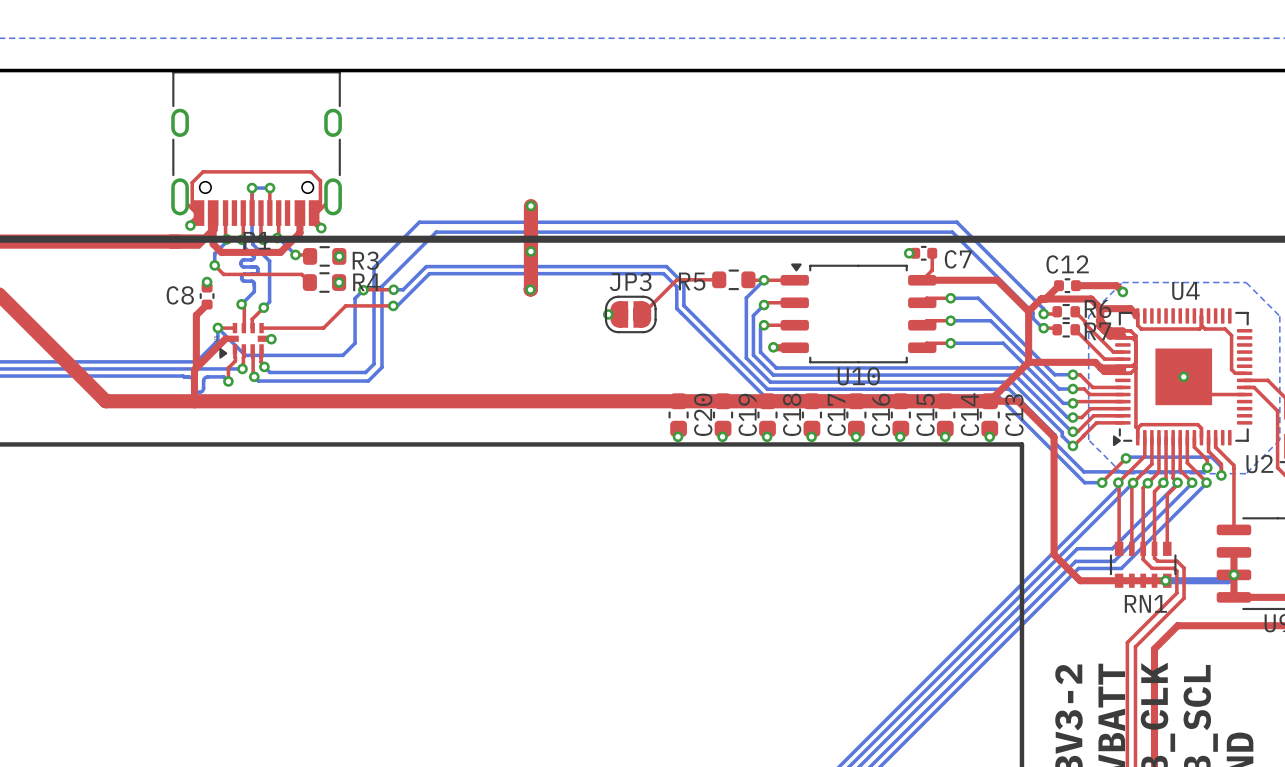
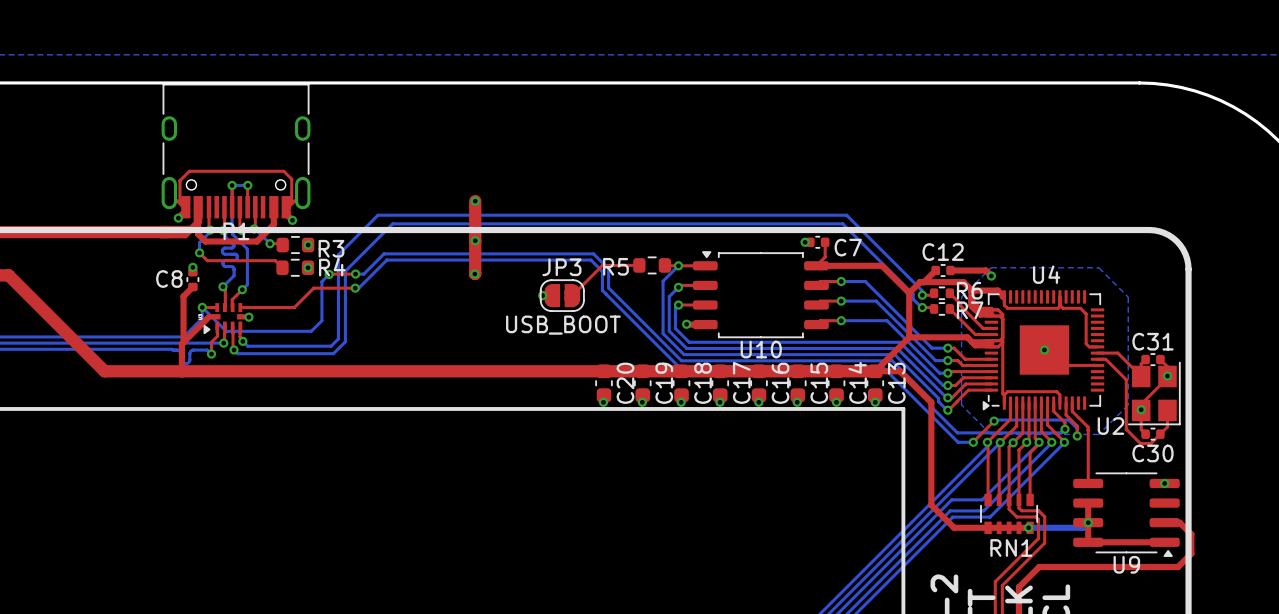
JP3 value: none -> USB_BOOT (563, 325)

